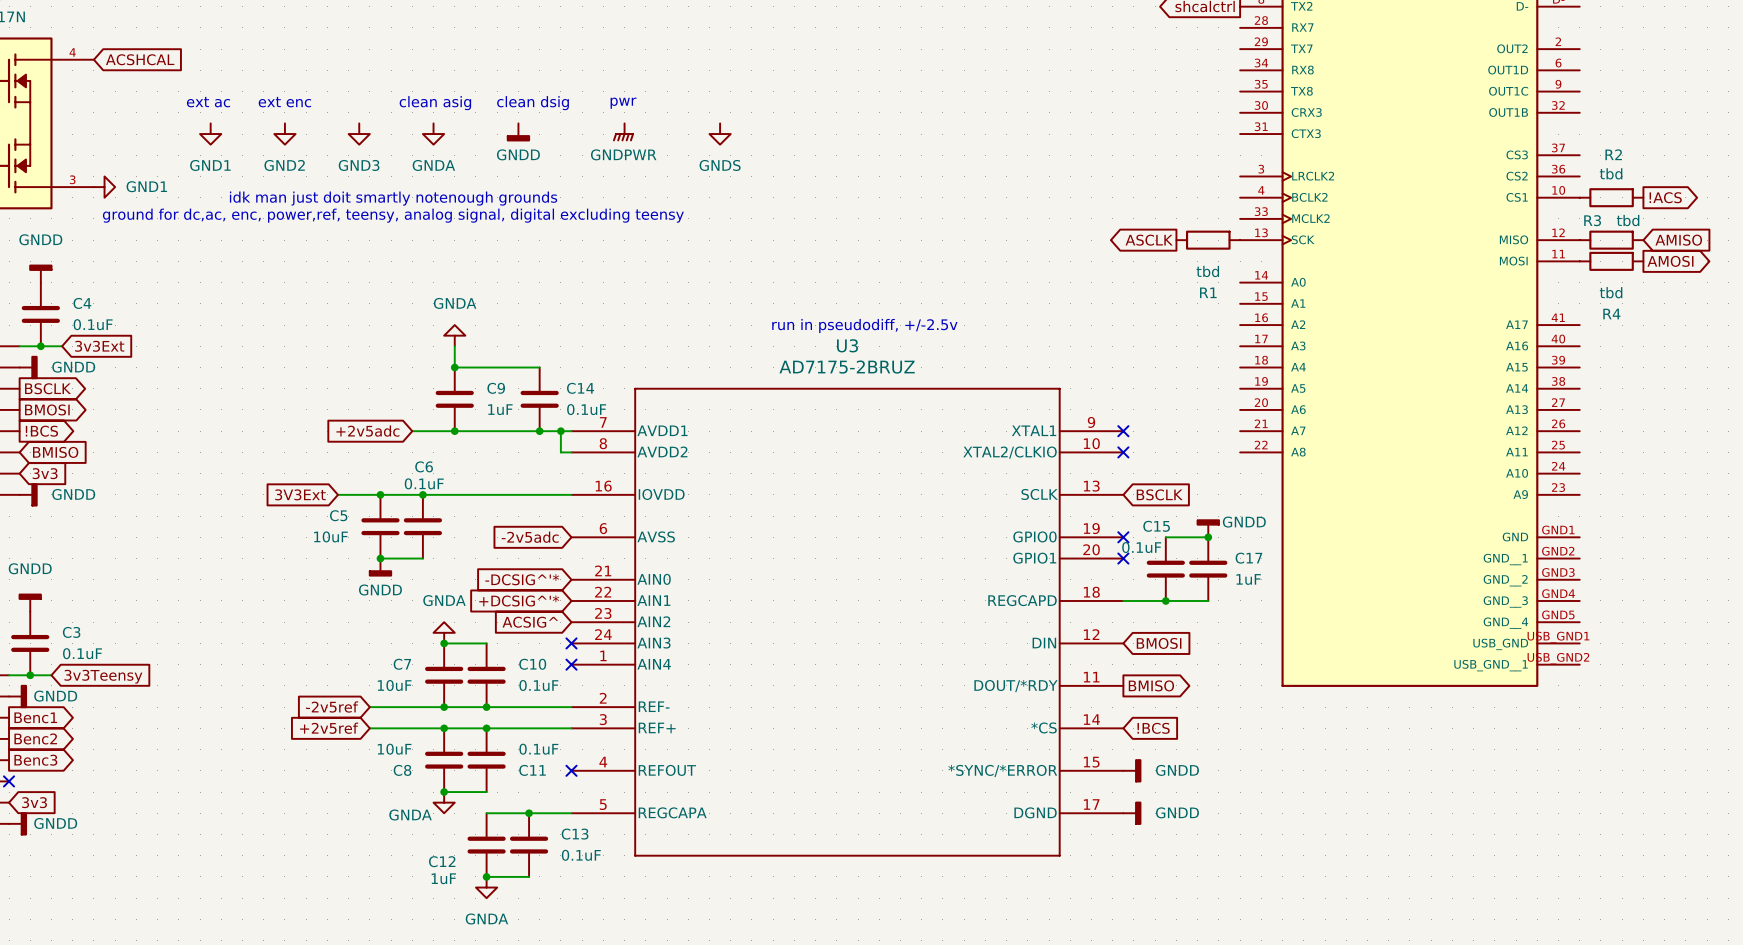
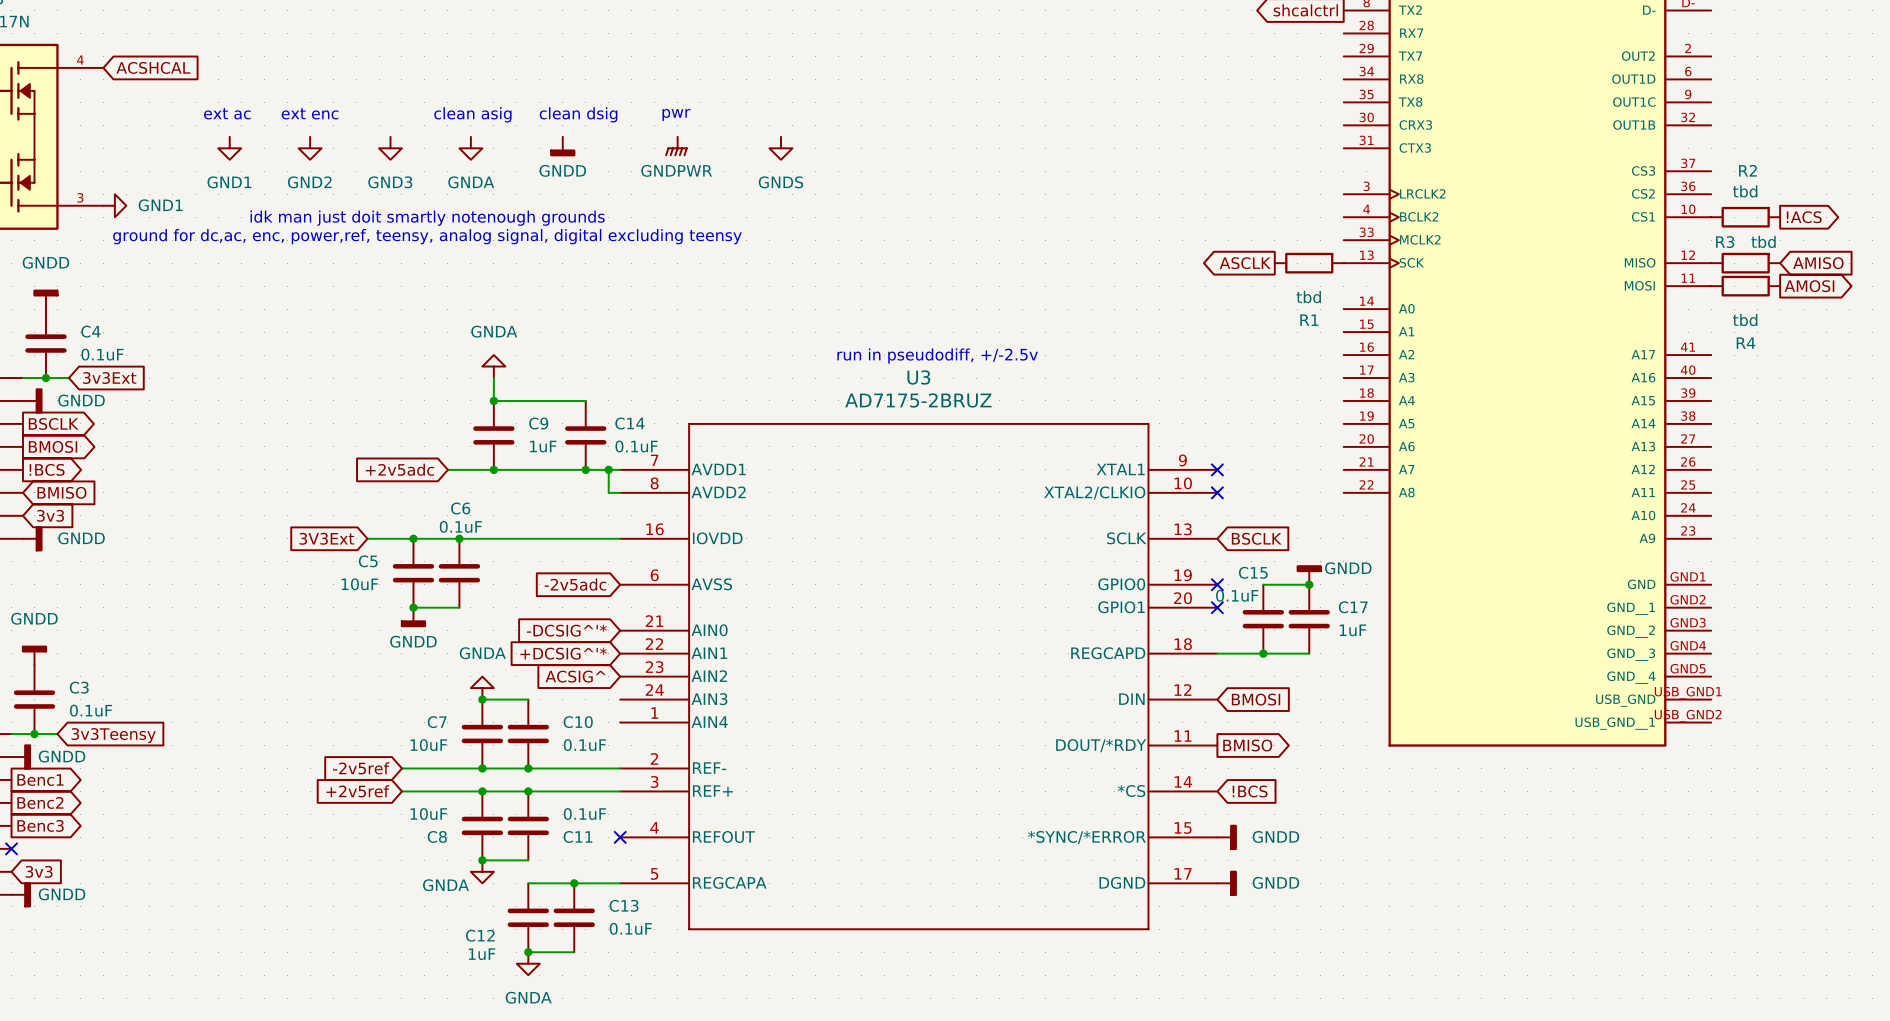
no-connect mark: (571, 643) -> none
no-connect mark: (571, 664) -> none

